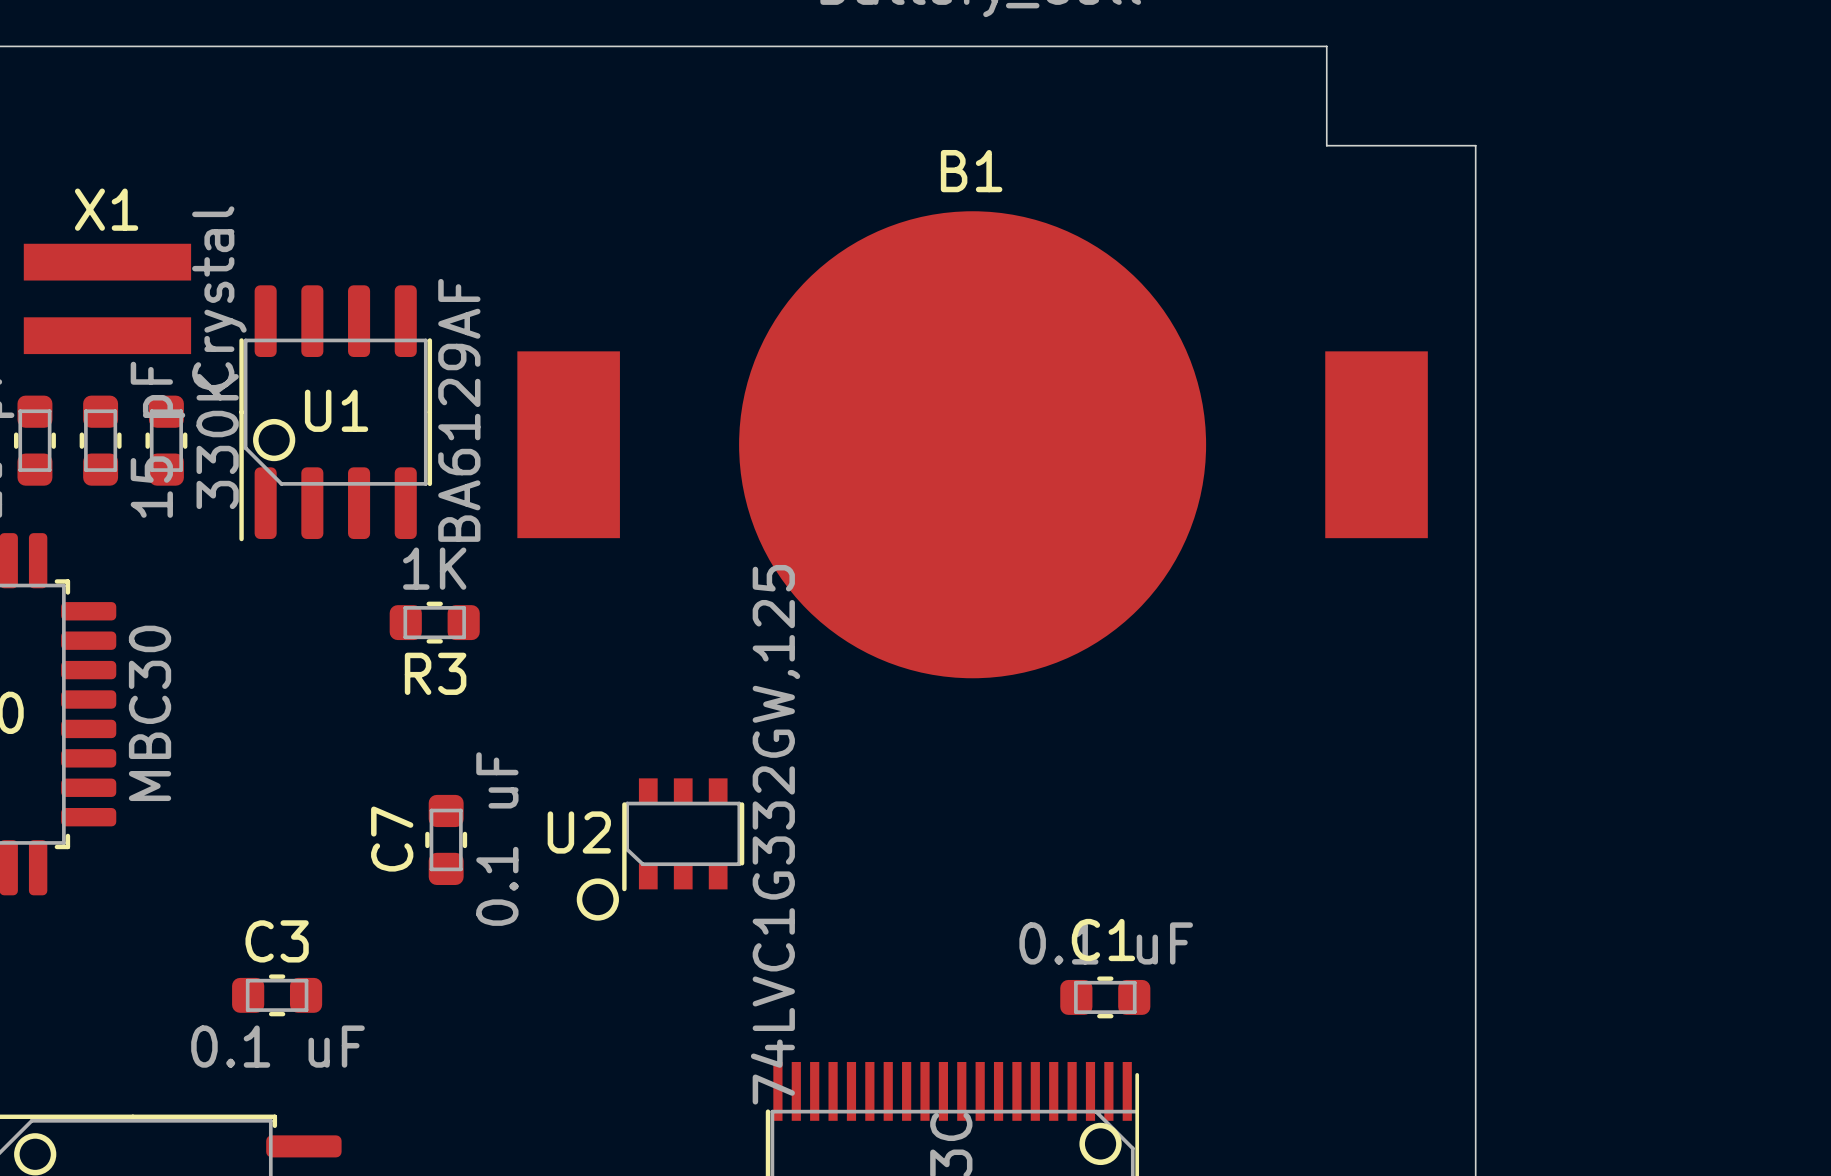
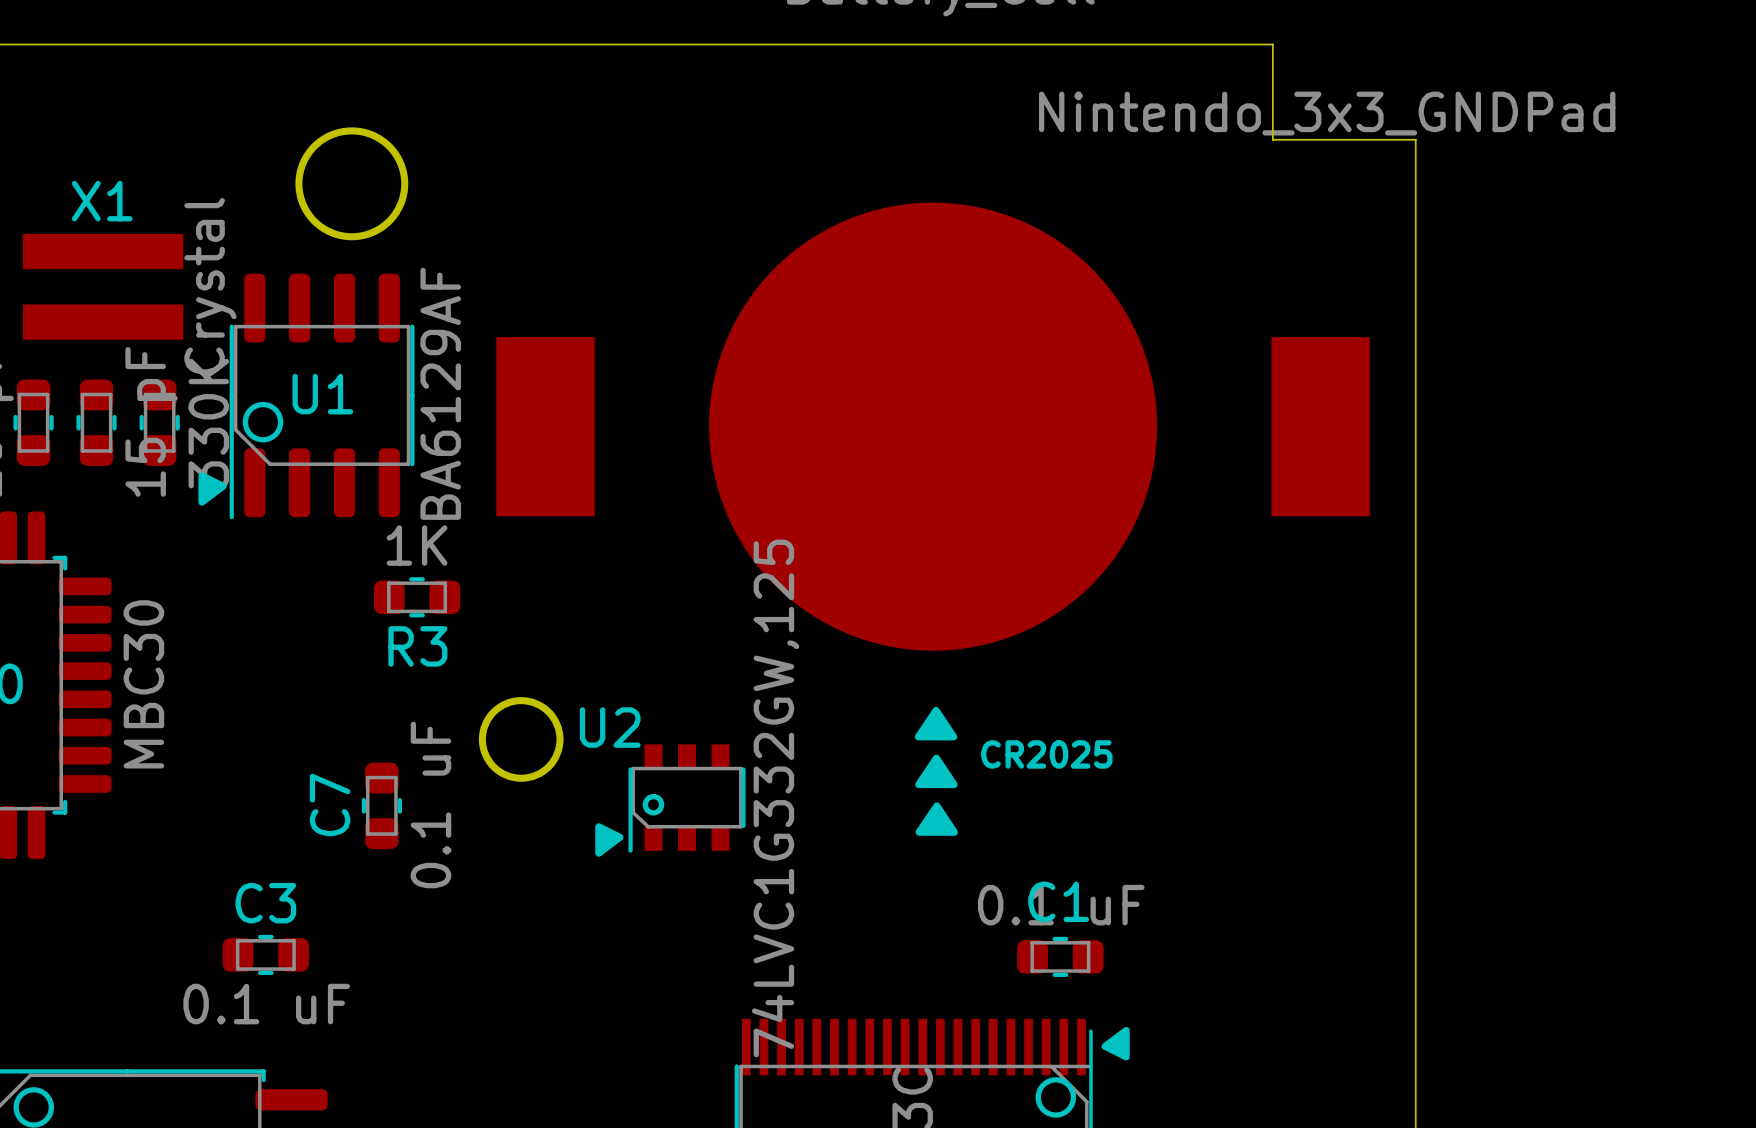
drawing: none -> [1038, 91, 1616, 136]
round board edge: none -> [295, 127, 409, 241]
B1 name: B1 (971, 171) -> CR2025 (1046, 754)
drawing: none -> [198, 472, 227, 506]
round board edge: none -> [478, 697, 564, 782]
drawing: none -> [914, 706, 958, 836]
drawing: none -> [595, 793, 665, 857]
U2 name position: U2 (579, 832) -> U2 (610, 727)
U2 position: (683, 834) -> (687, 798)
C7 position: (446, 839) -> (381, 805)
drawing: [576, 878, 619, 921] -> none
drawing: none -> [1101, 1026, 1130, 1061]

